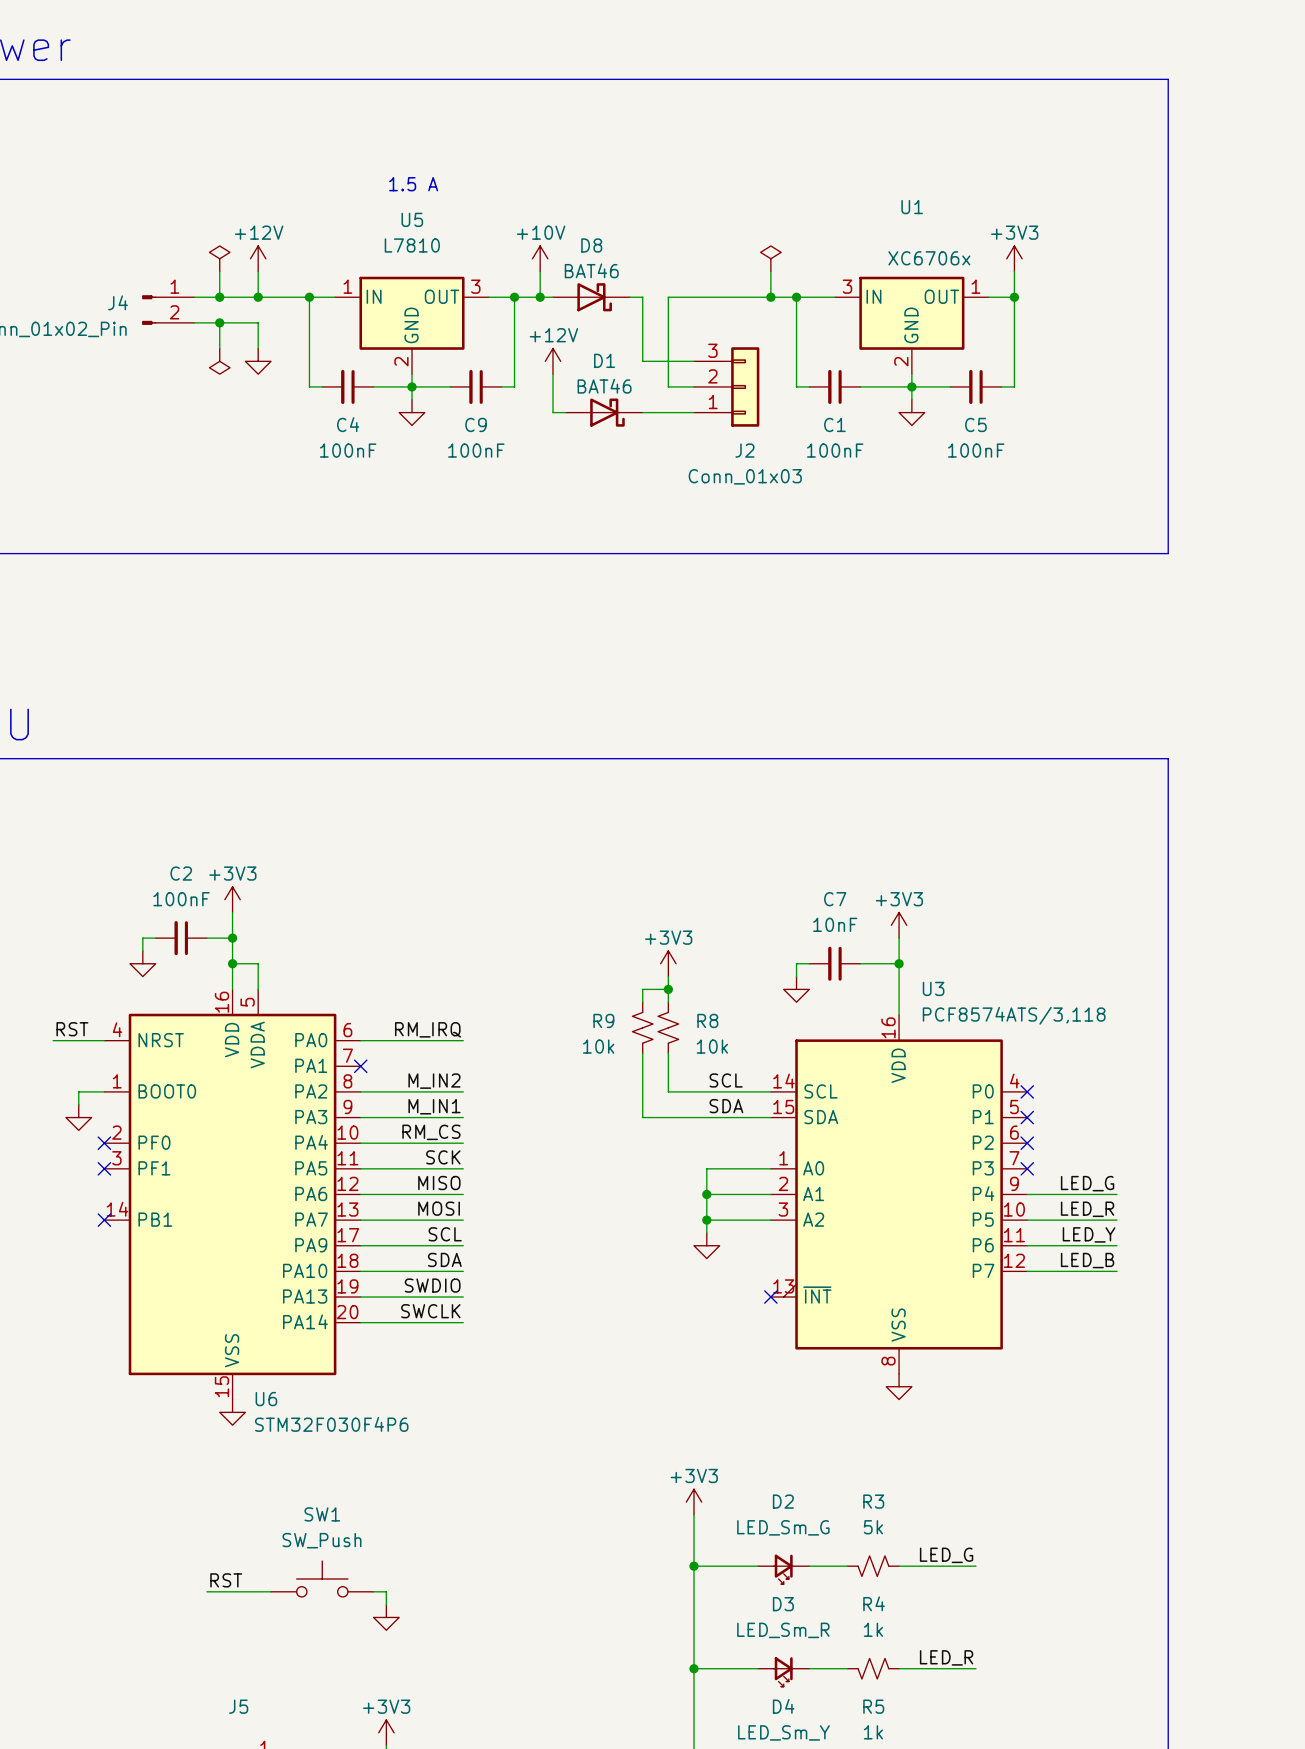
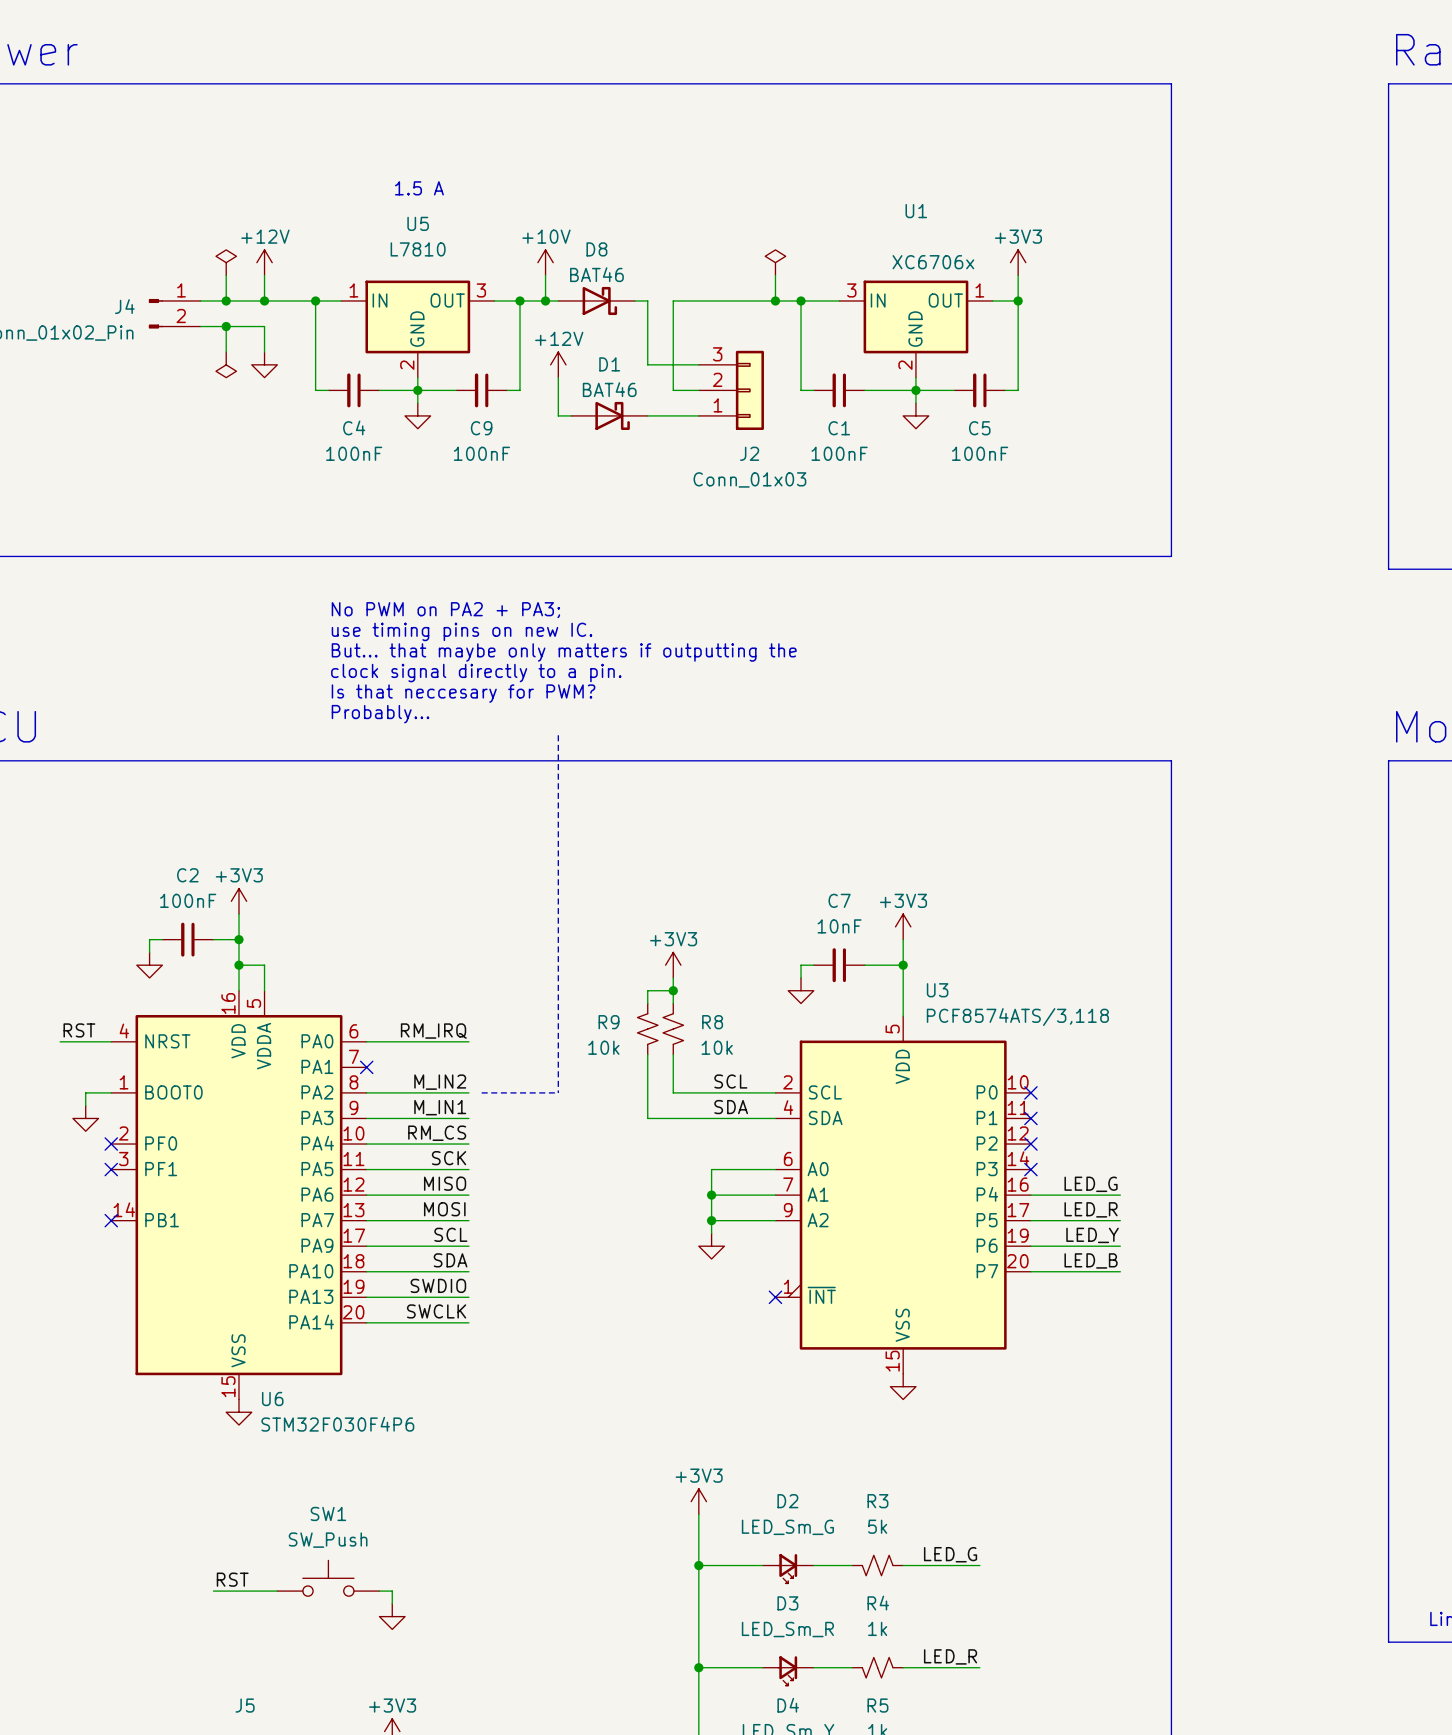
text: none -> No PWM on PA2 + PA3; (445, 610)
text: none -> use timing pins on new IC. (462, 631)
text: none -> But... that maybe only matters if outputting the (564, 652)
text: none -> clock signal directly to a pin. (476, 673)
text: none -> Is that neccesary for PWM? (463, 693)
text: none -> Probably... (380, 714)
line: none -> (558, 735) (558, 1092) (481, 1092)
U3 symbol: [770, 1015, 1028, 1374] -> [775, 1016, 1031, 1374]

